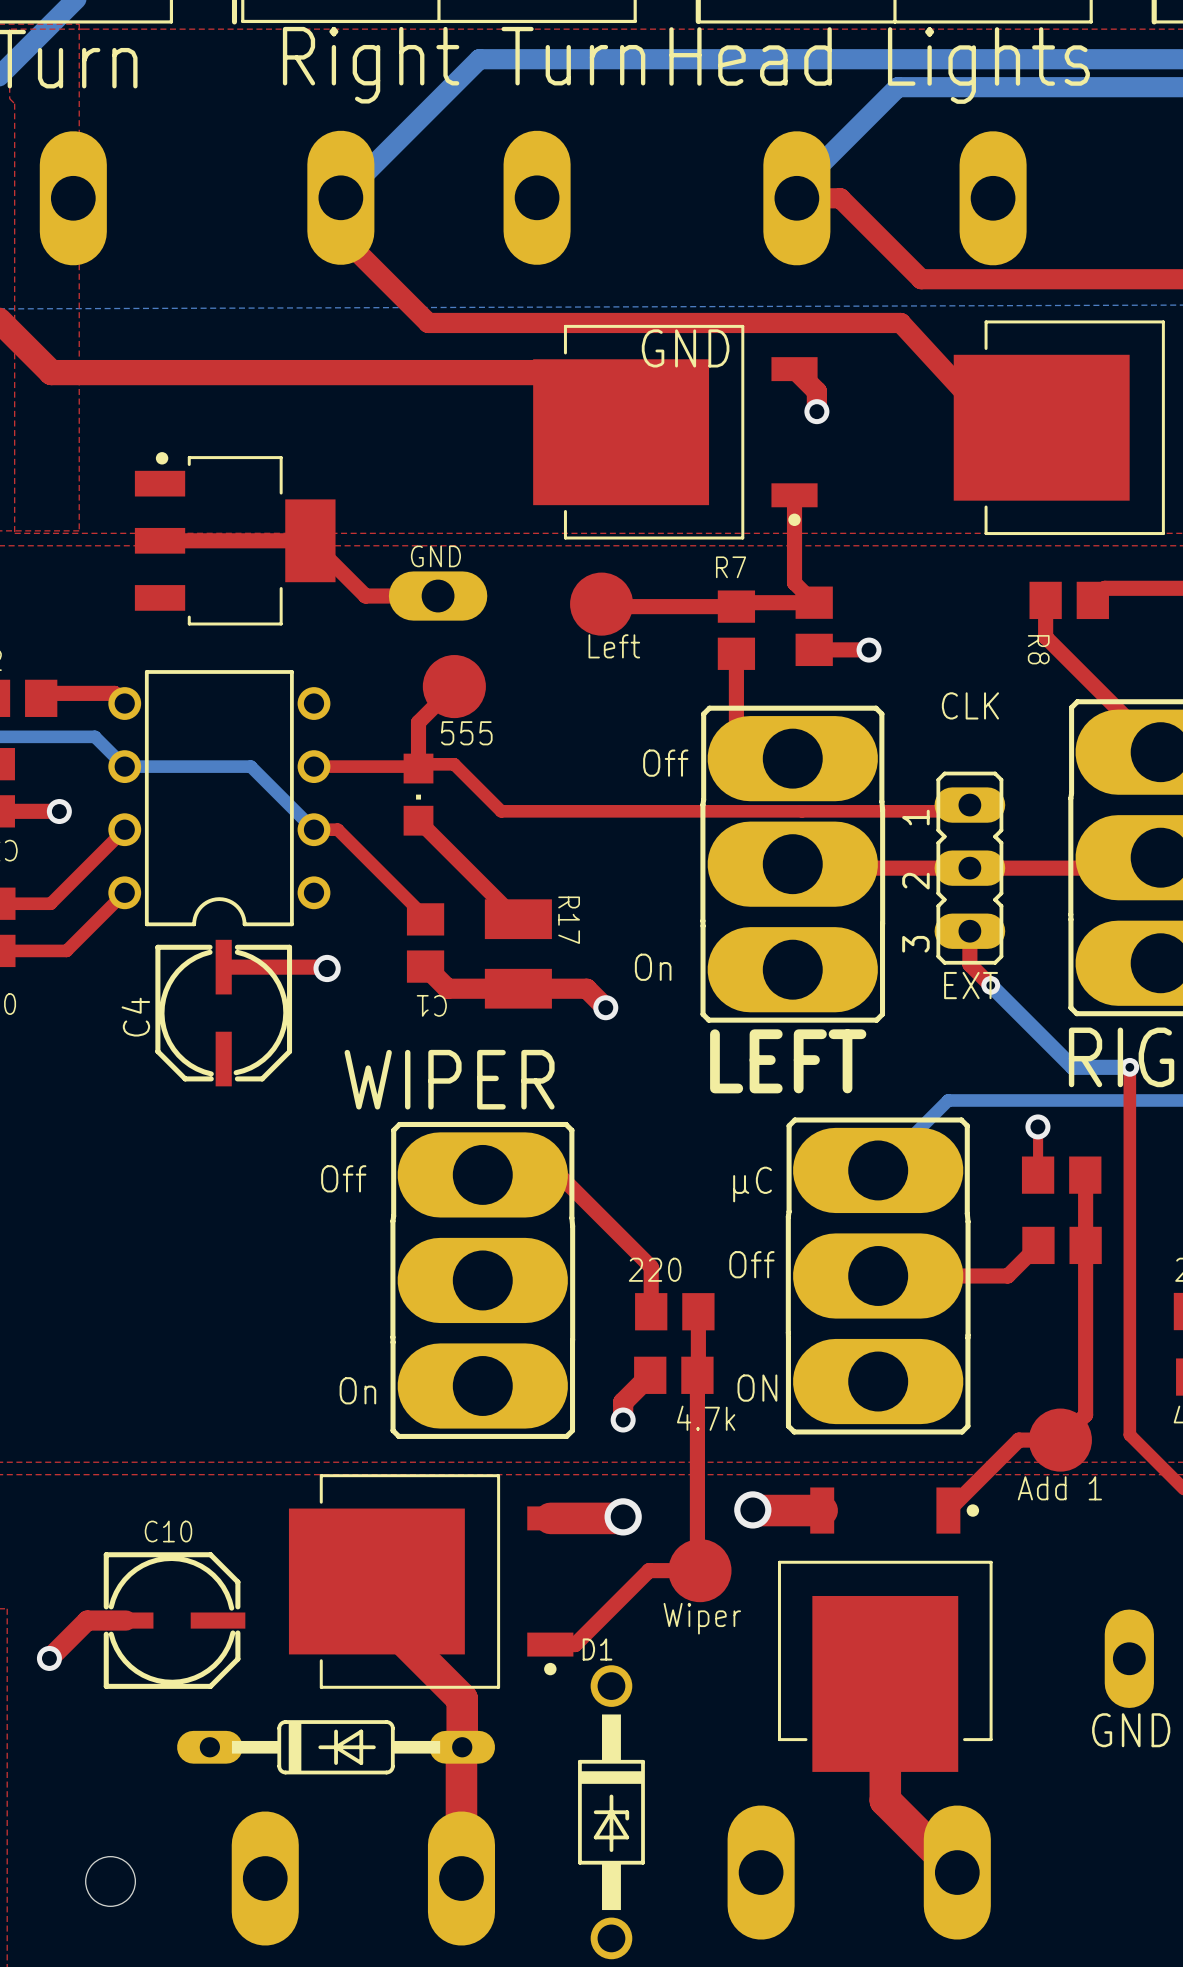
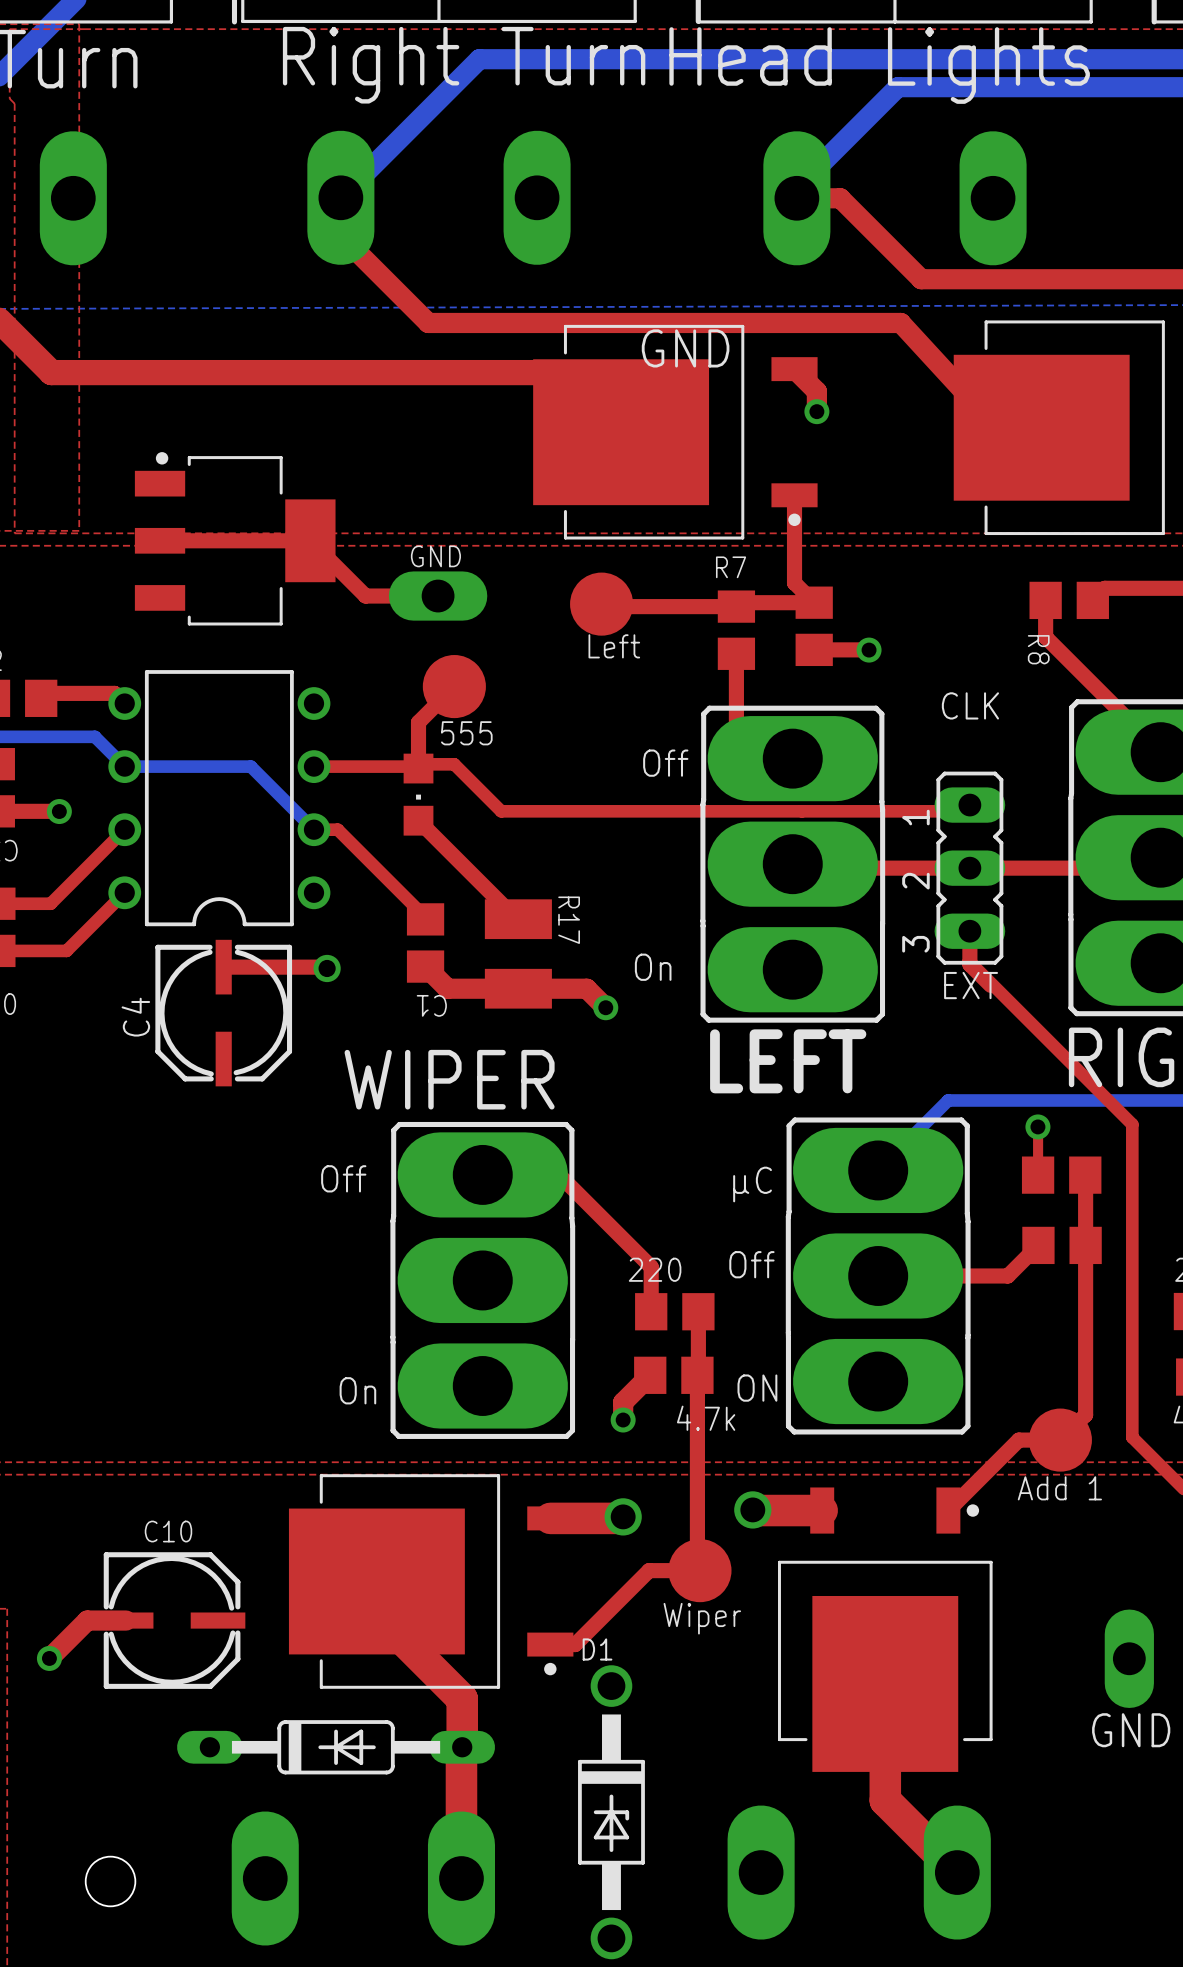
bottom track: (990, 985) (1072, 1067) (1129, 1067) -> none
via: (990, 985) -> none
top track: (1129, 1067) (1129, 1434) (1132, 1437) -> (969, 962) (1132, 1124) (1132, 1437)
via: (1129, 1067) -> none

